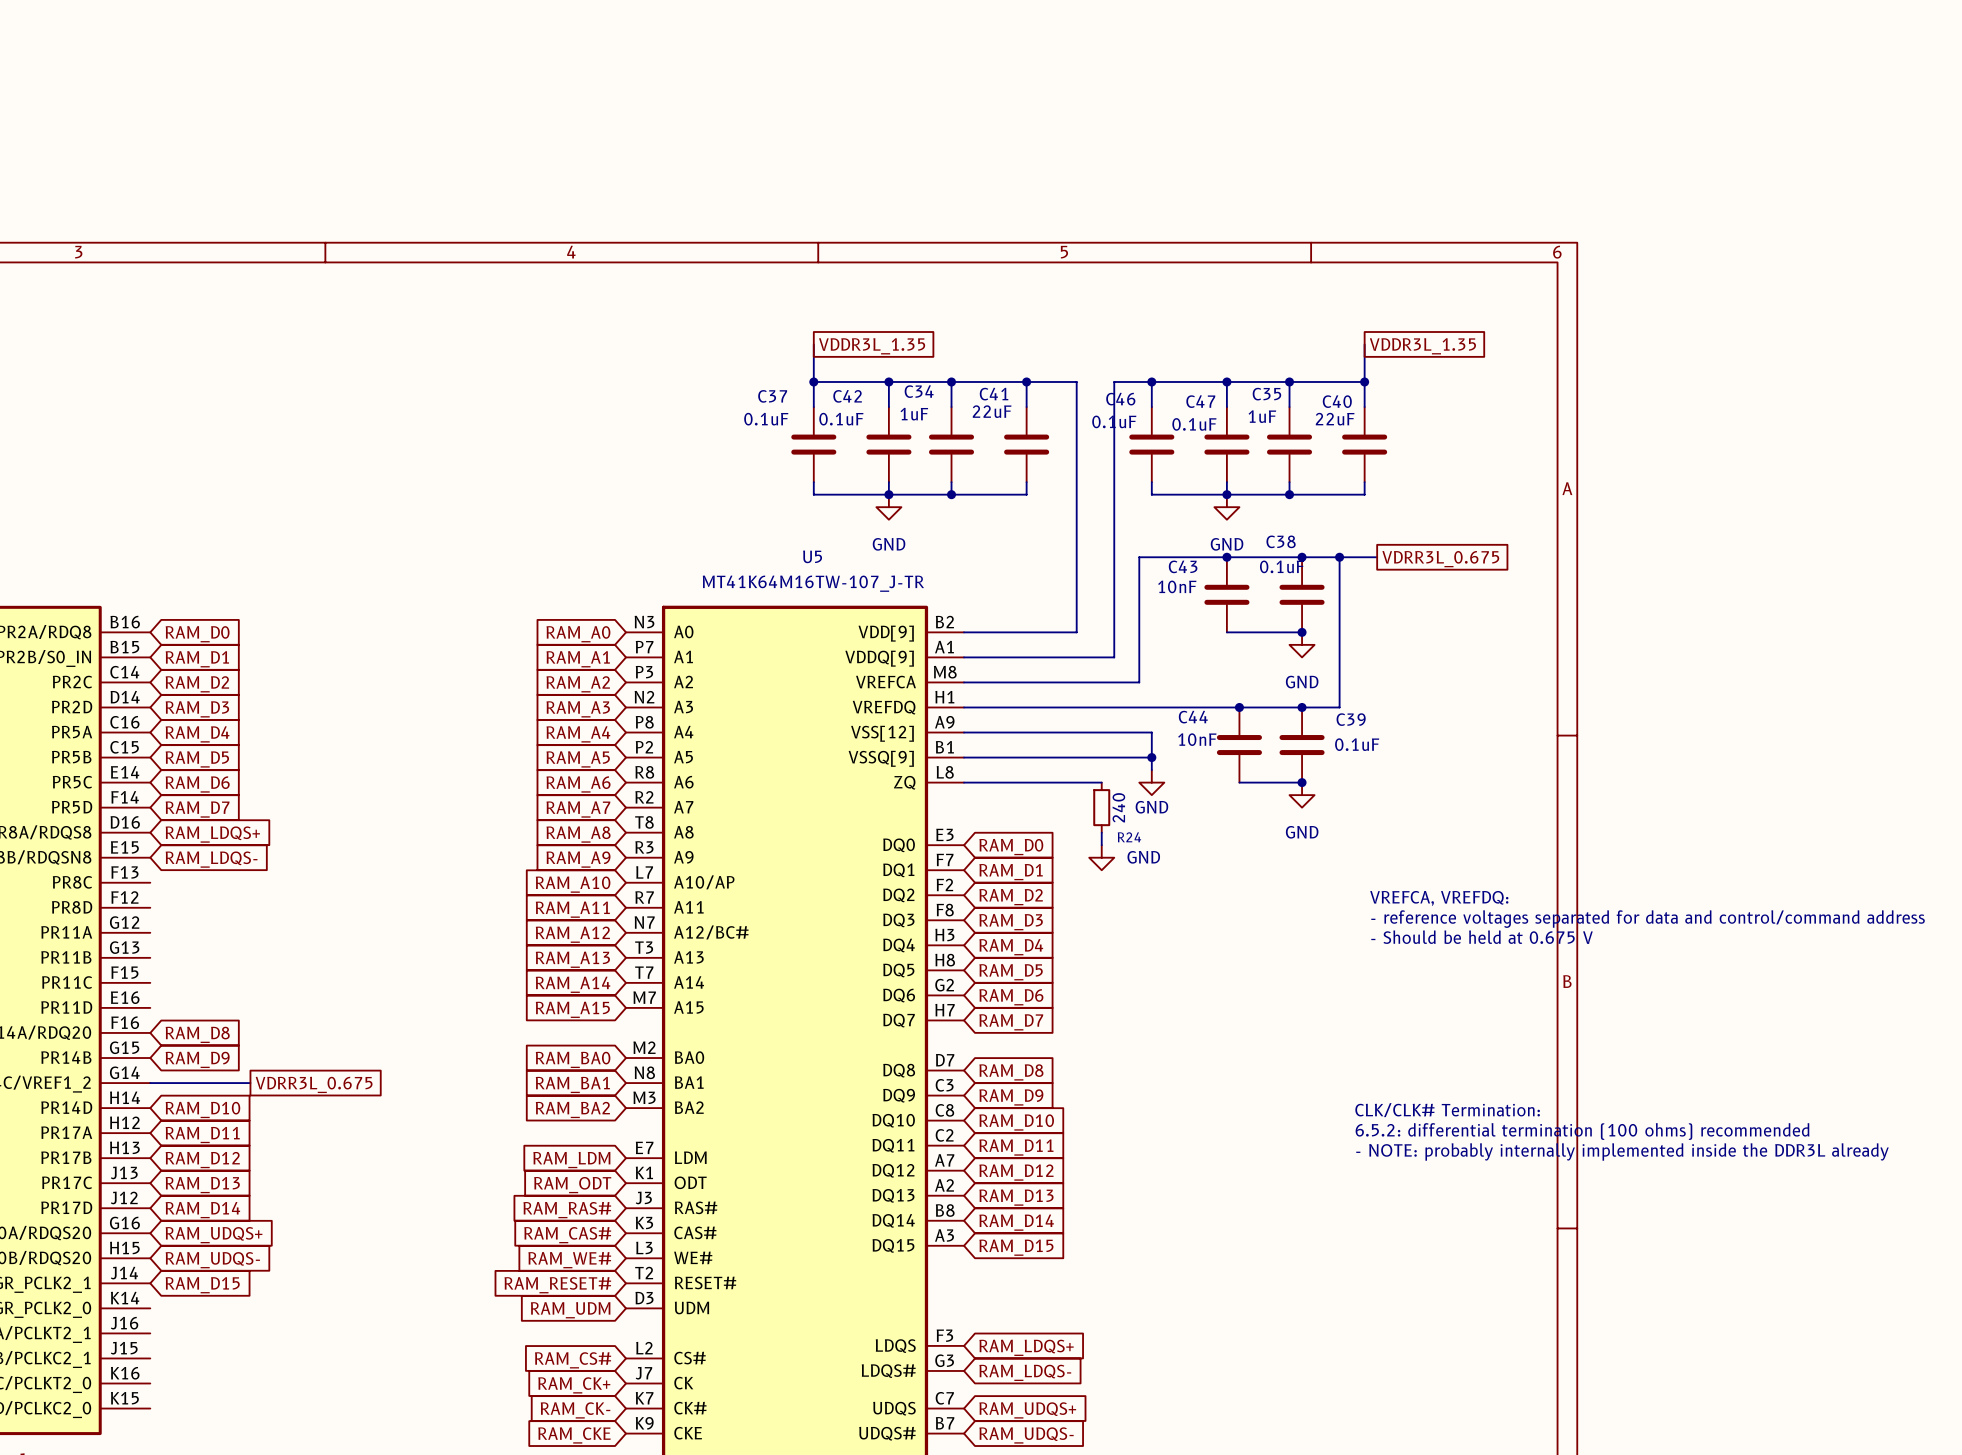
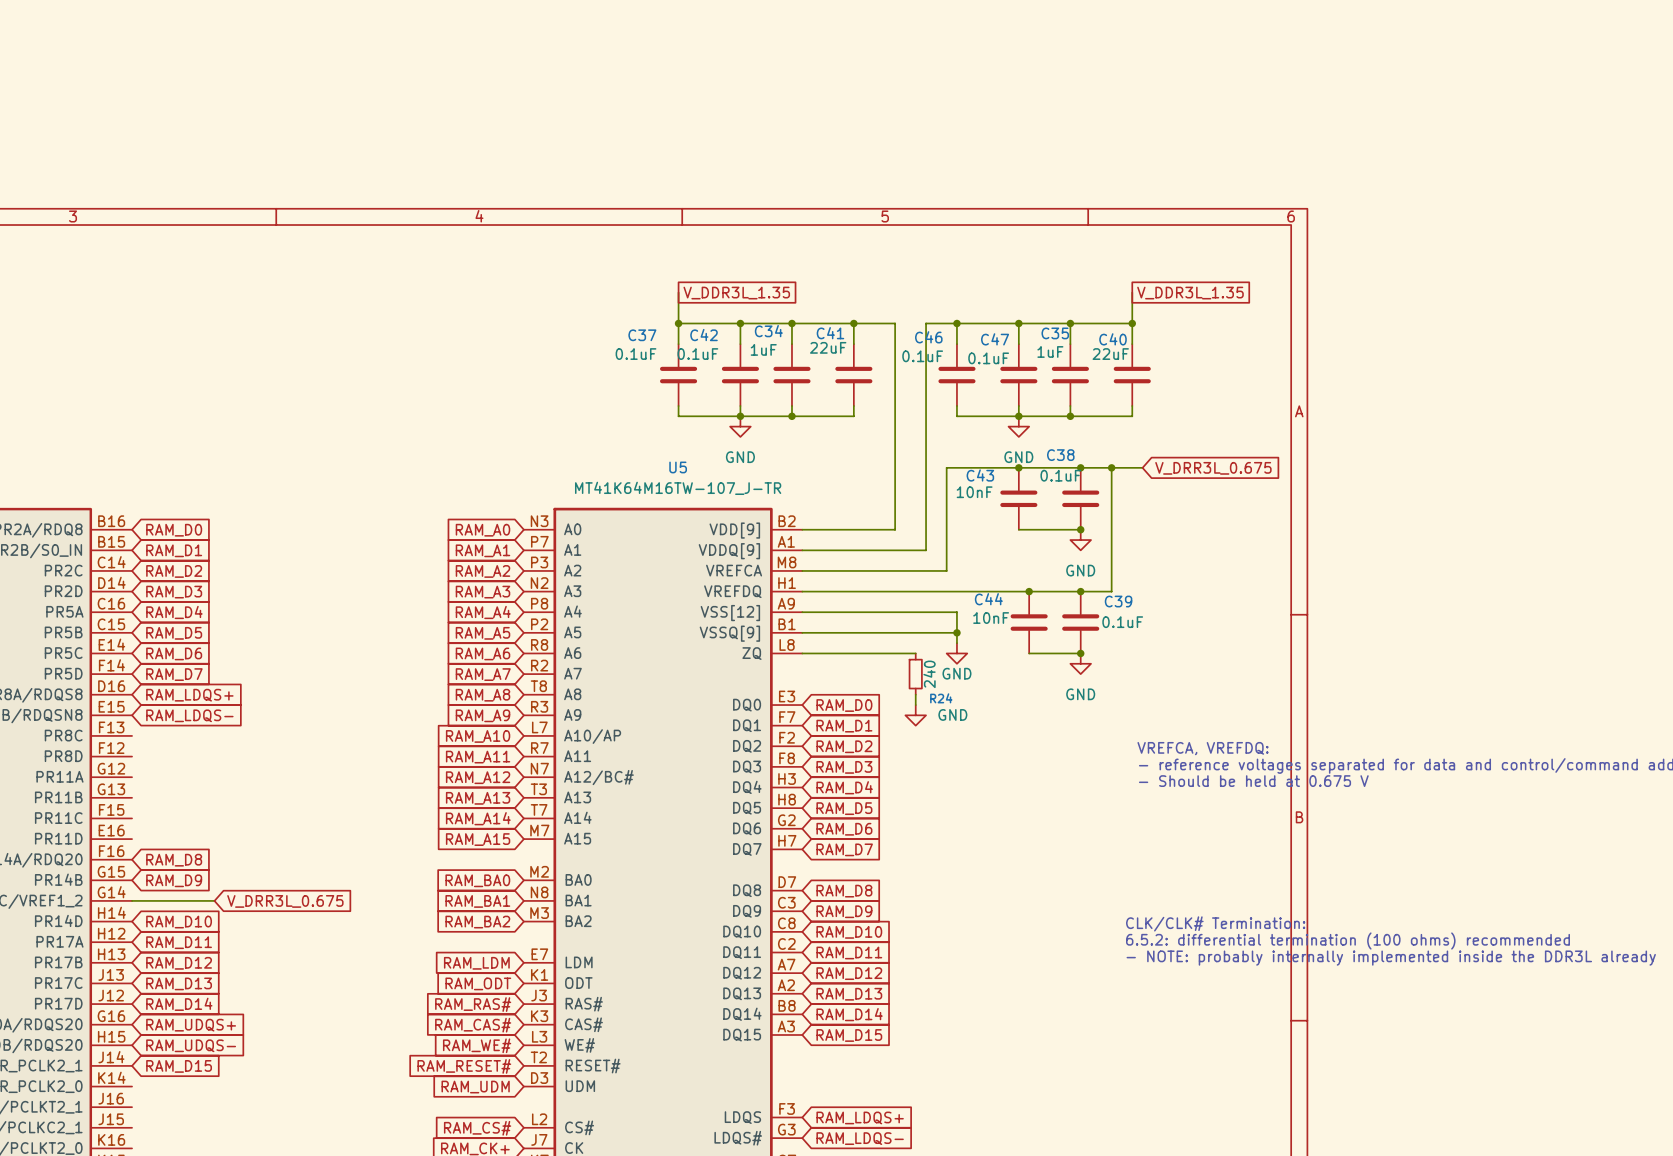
global label: VDDR3L_1.35 (872, 346) -> V_DDR3L_1.35 (736, 293)
global label: VDDR3L_1.35 (1422, 346) -> V_DDR3L_1.35 (1190, 293)
global label shape: passive (1440, 559) -> input (1213, 468)
global label: VDRR3L_0.675 (1440, 559) -> V_DRR3L_0.675 (1213, 468)
global label shape: passive (314, 1084) -> input (285, 901)
global label: VDRR3L_0.675 (314, 1084) -> V_DRR3L_0.675 (285, 901)

